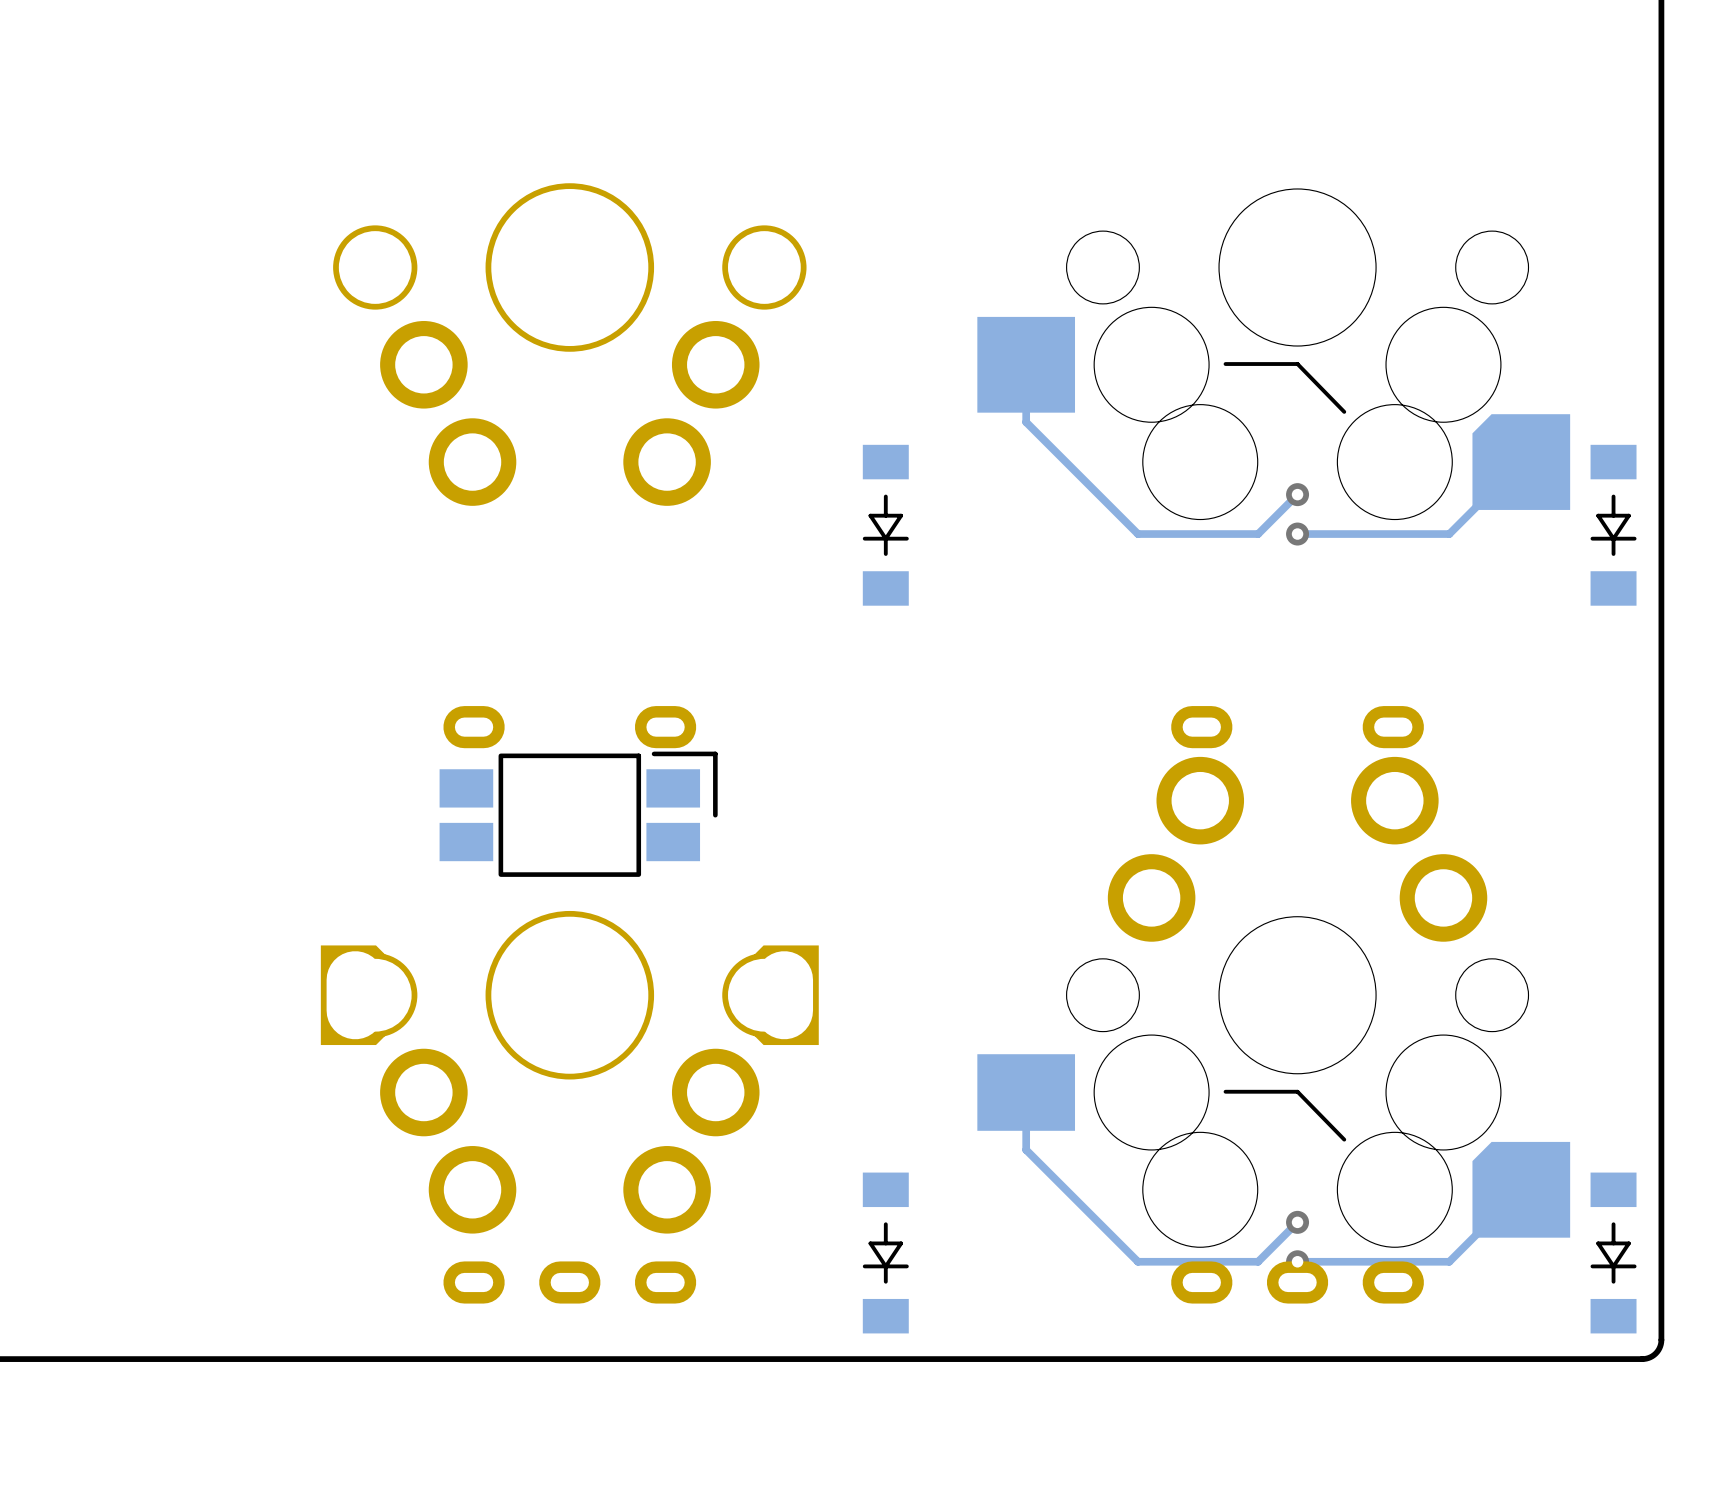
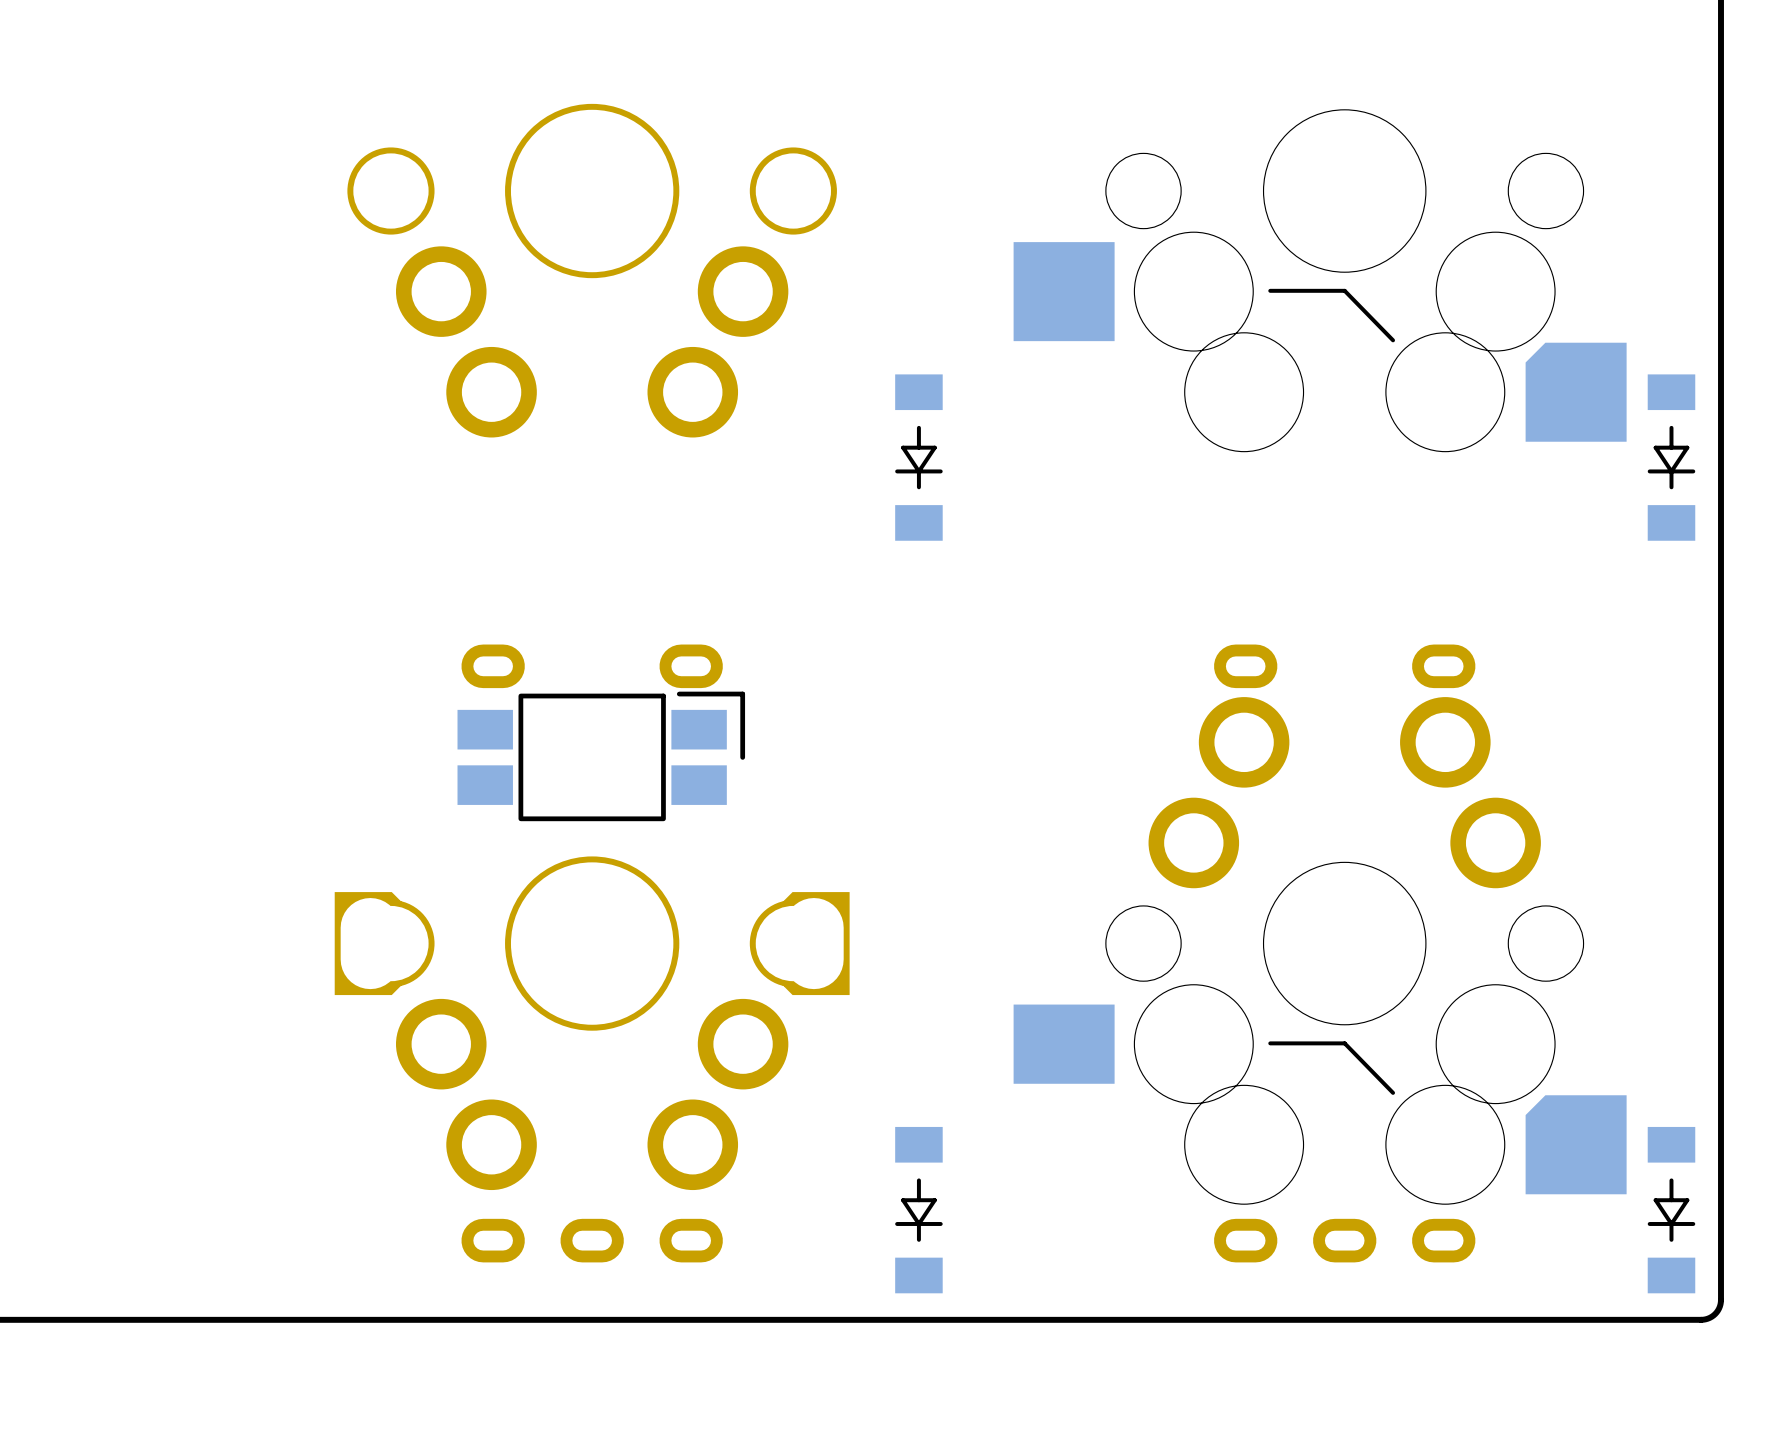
track: (1026, 364) (1026, 422) (1137, 534) (1258, 534) (1297, 494) -> none
track: (1521, 462) (1449, 534) (1297, 534) -> none
via: (1297, 494) -> none
via: (1297, 534) -> none
track: (1026, 1092) (1026, 1149) (1137, 1261) (1258, 1261) (1297, 1222) -> none
track: (1521, 1189) (1449, 1261) (1297, 1261) -> none
via: (1297, 1222) -> none
via: (1297, 1261) -> none

